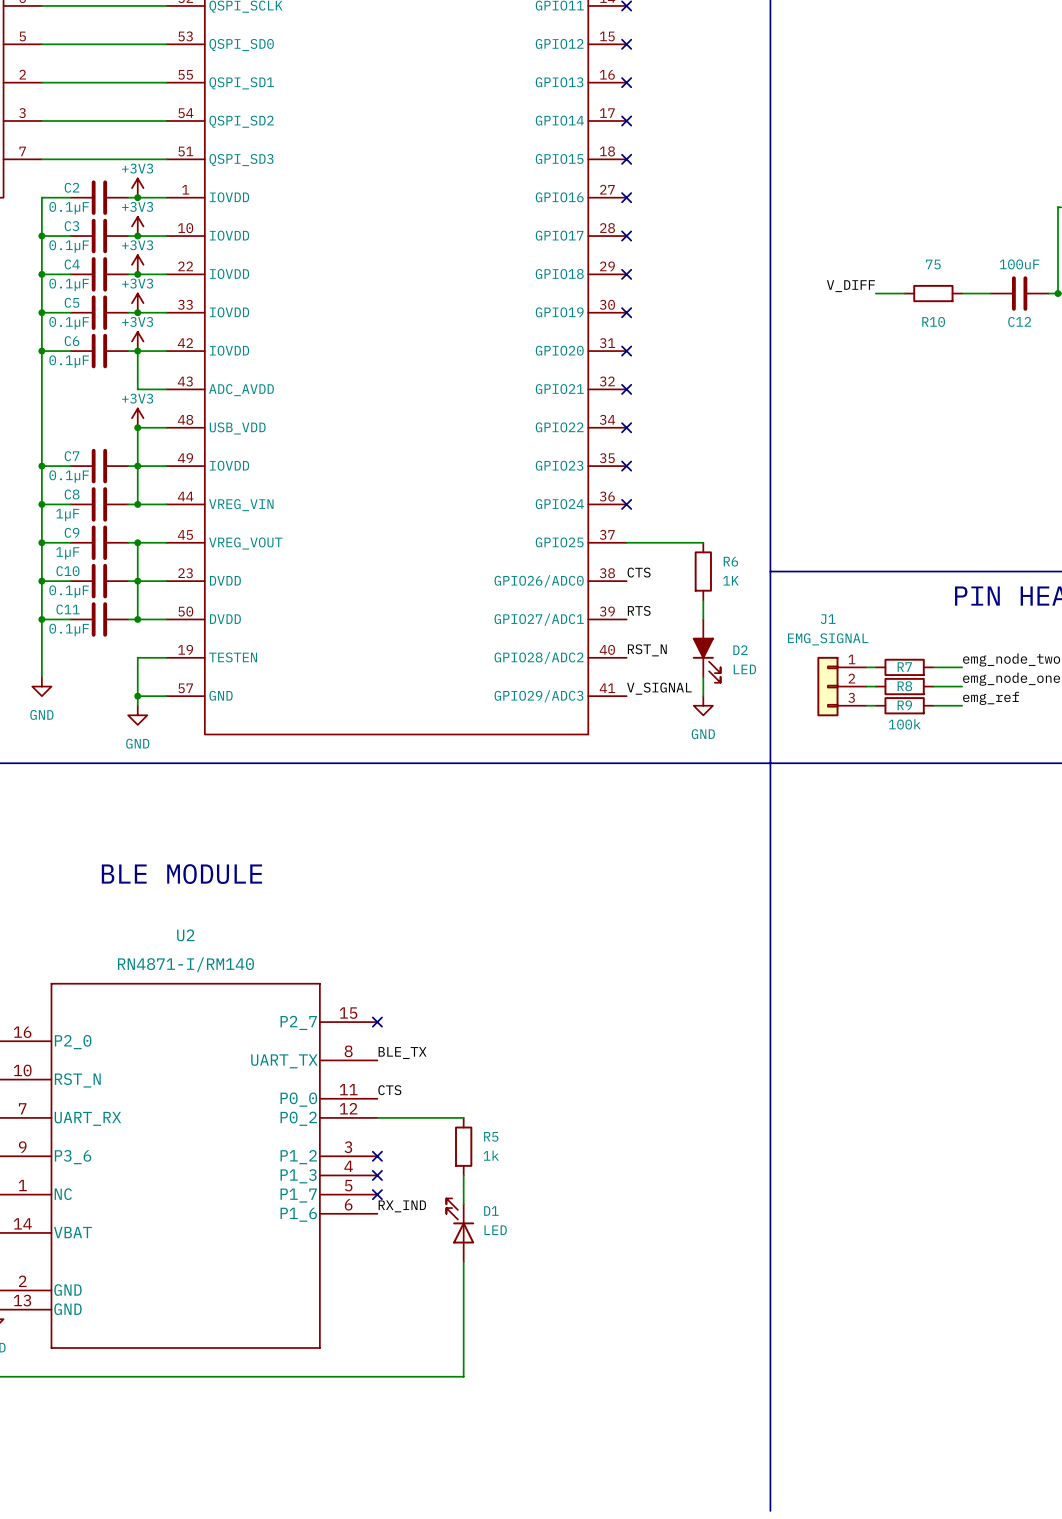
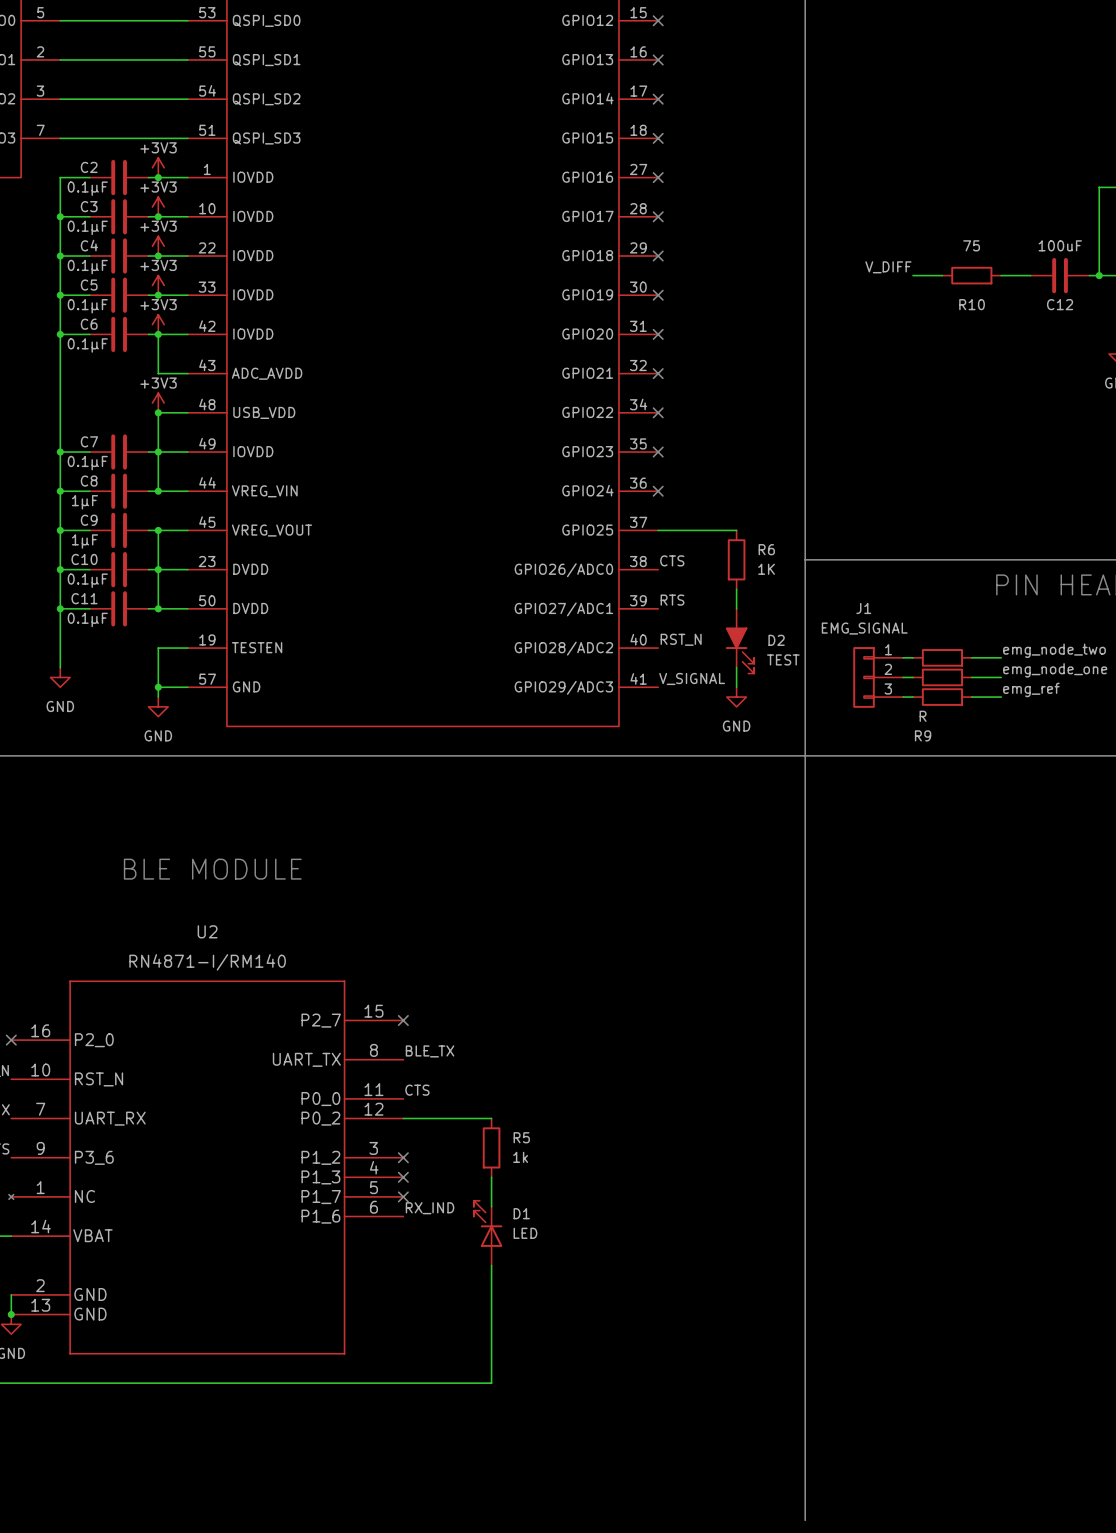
R7 name: R7 (904, 667) -> none
D2 value: LED (744, 669) -> TEST (783, 659)
R8 name: R8 (904, 686) -> none
R9 name position: R9 (904, 705) -> R9 (923, 735)
R9 value: 100k (904, 724) -> R (923, 716)

